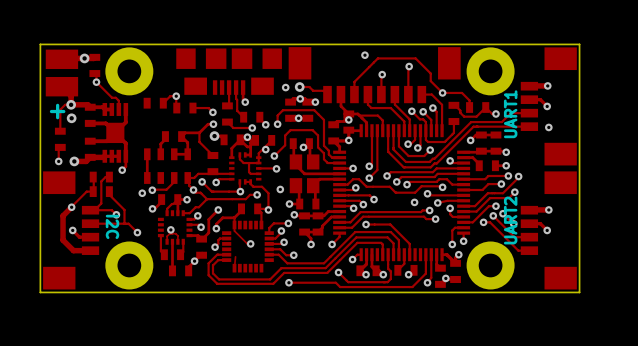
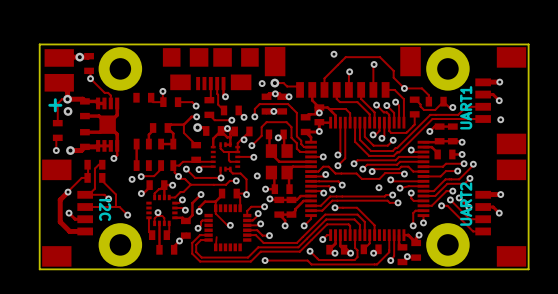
track: (176, 96) (170, 96) (163, 103) -> none
track: none -> (152, 102) (163, 102)

